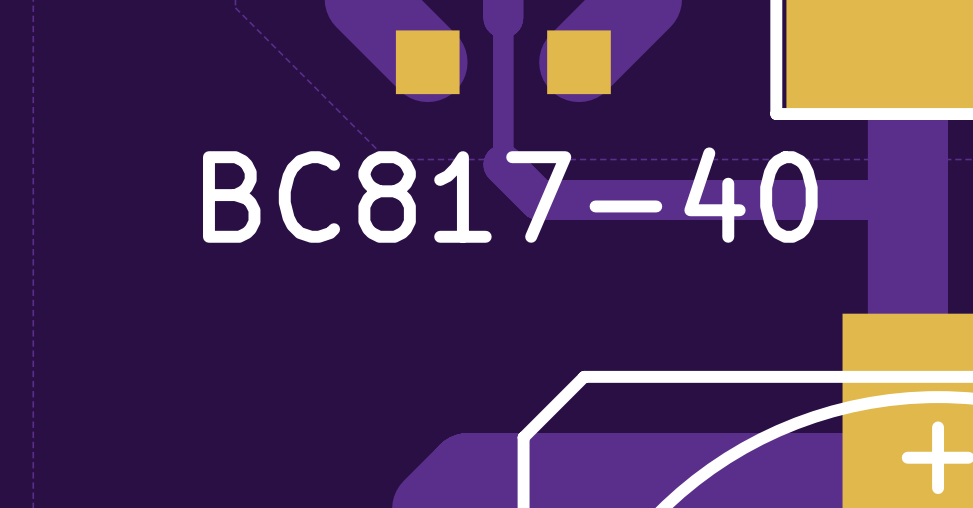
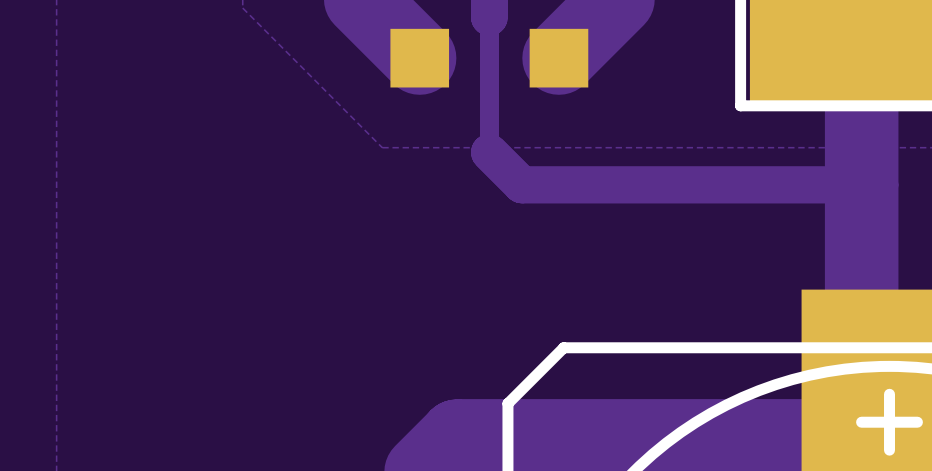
part value: BC817-40 (510, 195) -> none

